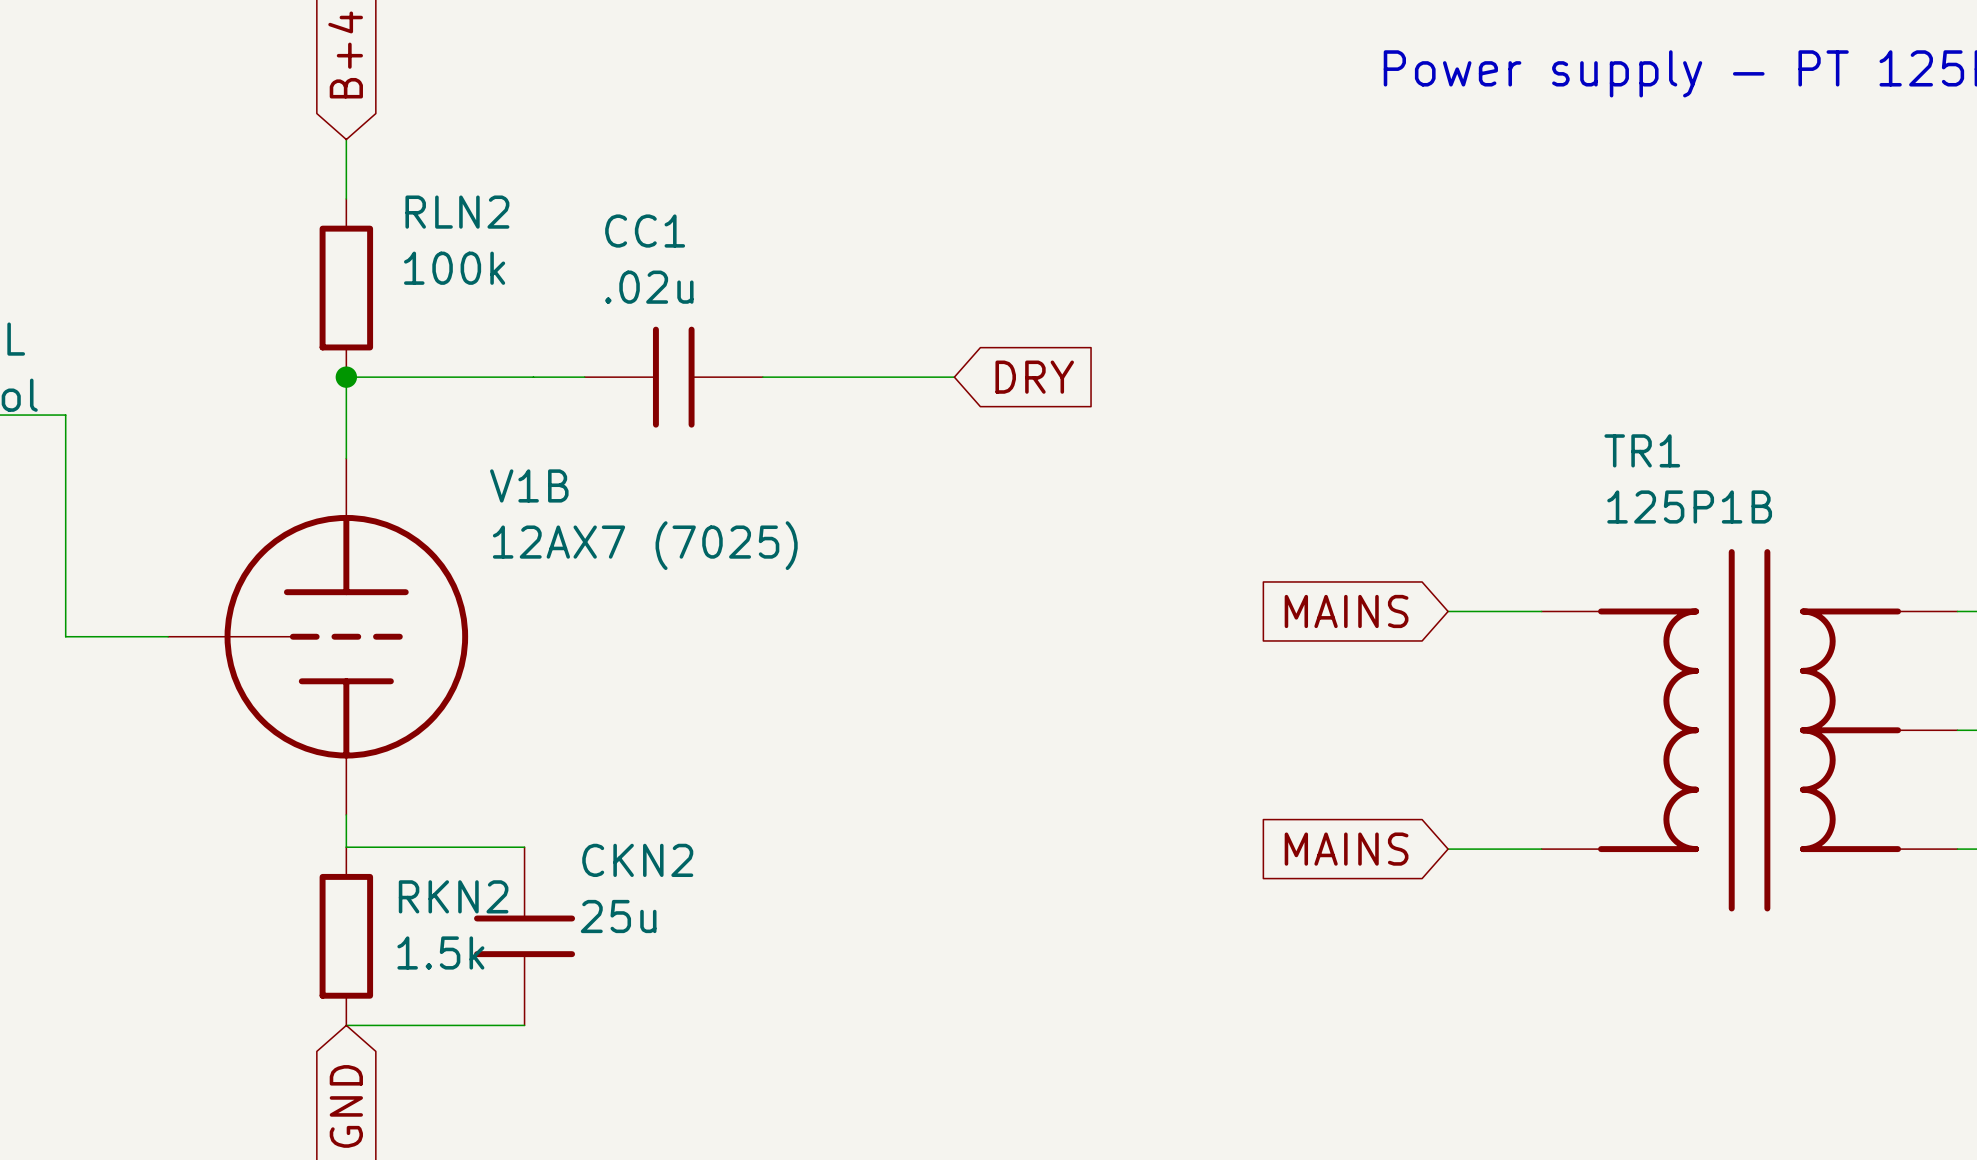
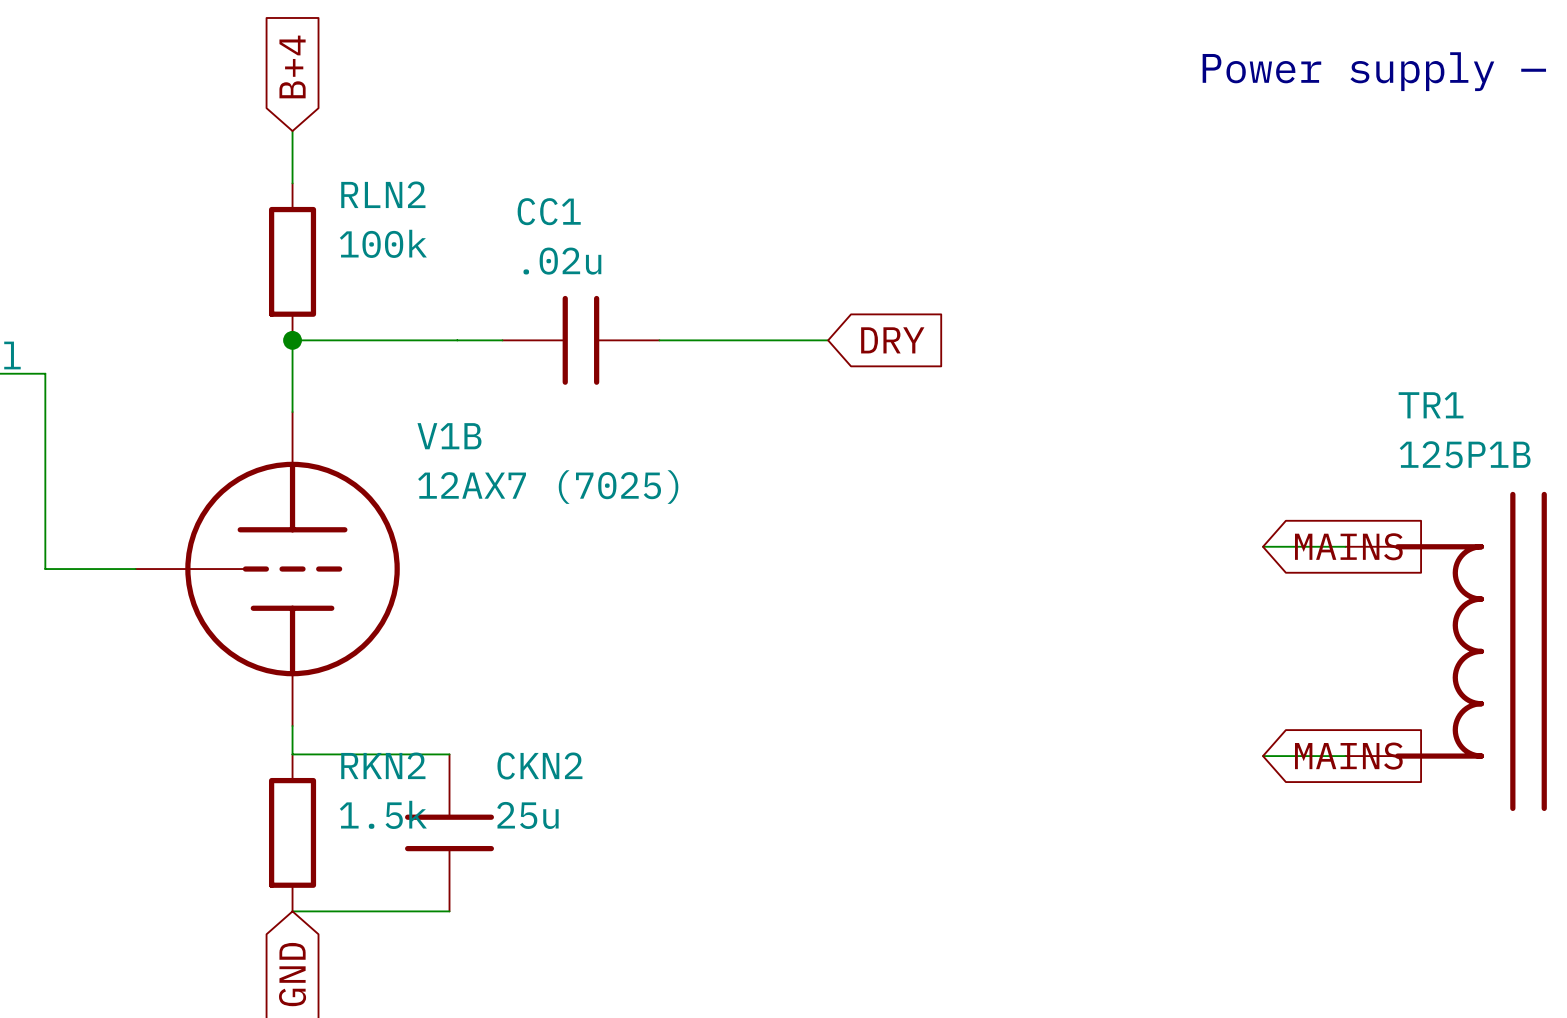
global label rotation: 0° (1346, 611) -> 180° (1348, 546)
global label rotation: 0° (1346, 849) -> 180° (1348, 756)
RKN2 name position: RKN2 (453, 896) -> RKN2 (383, 765)
RKN2 value position: 1.5k (440, 952) -> 1.5k (383, 814)

